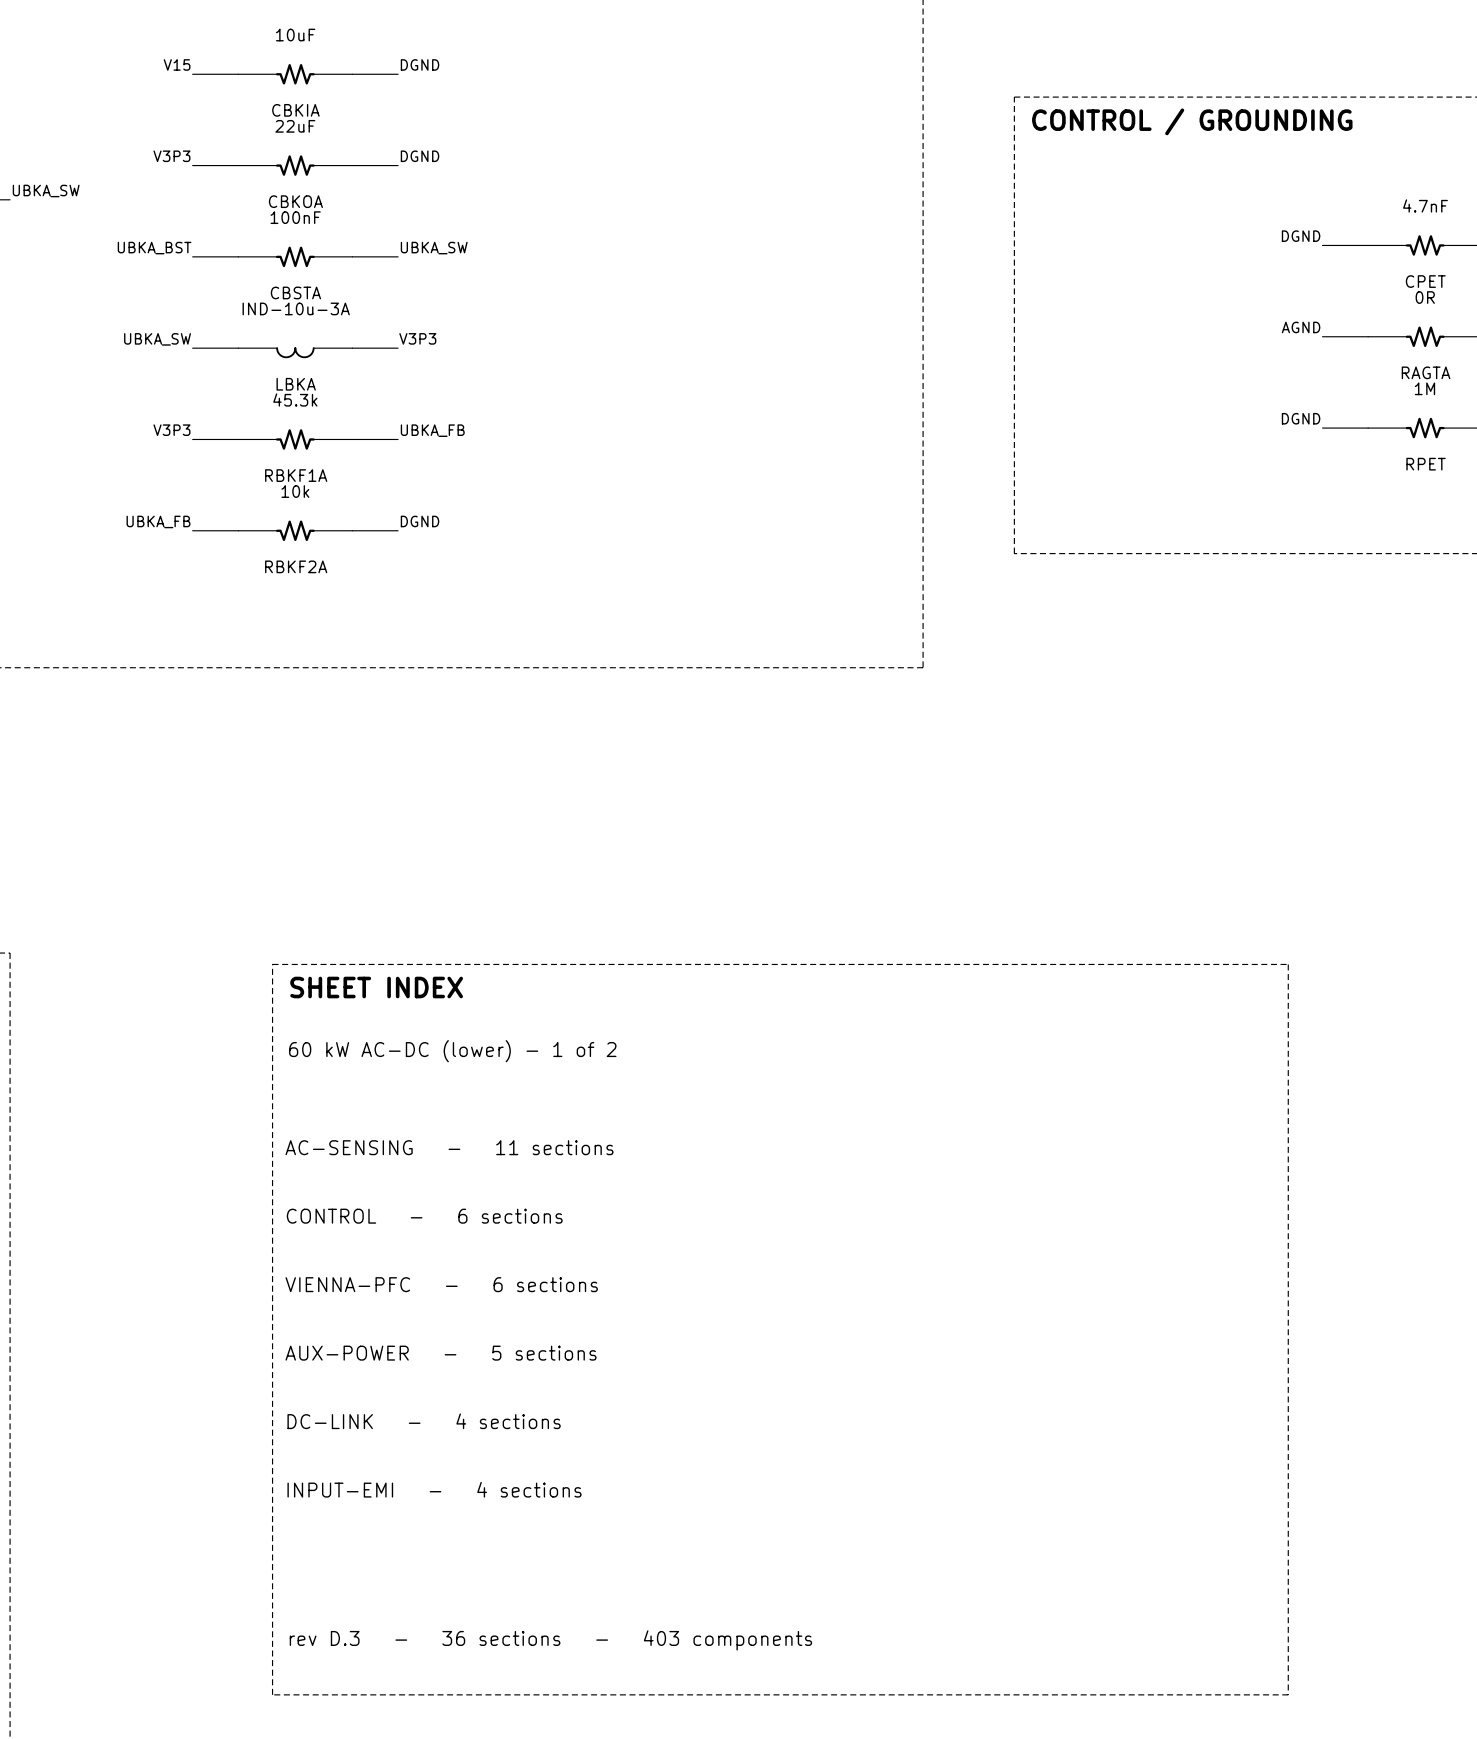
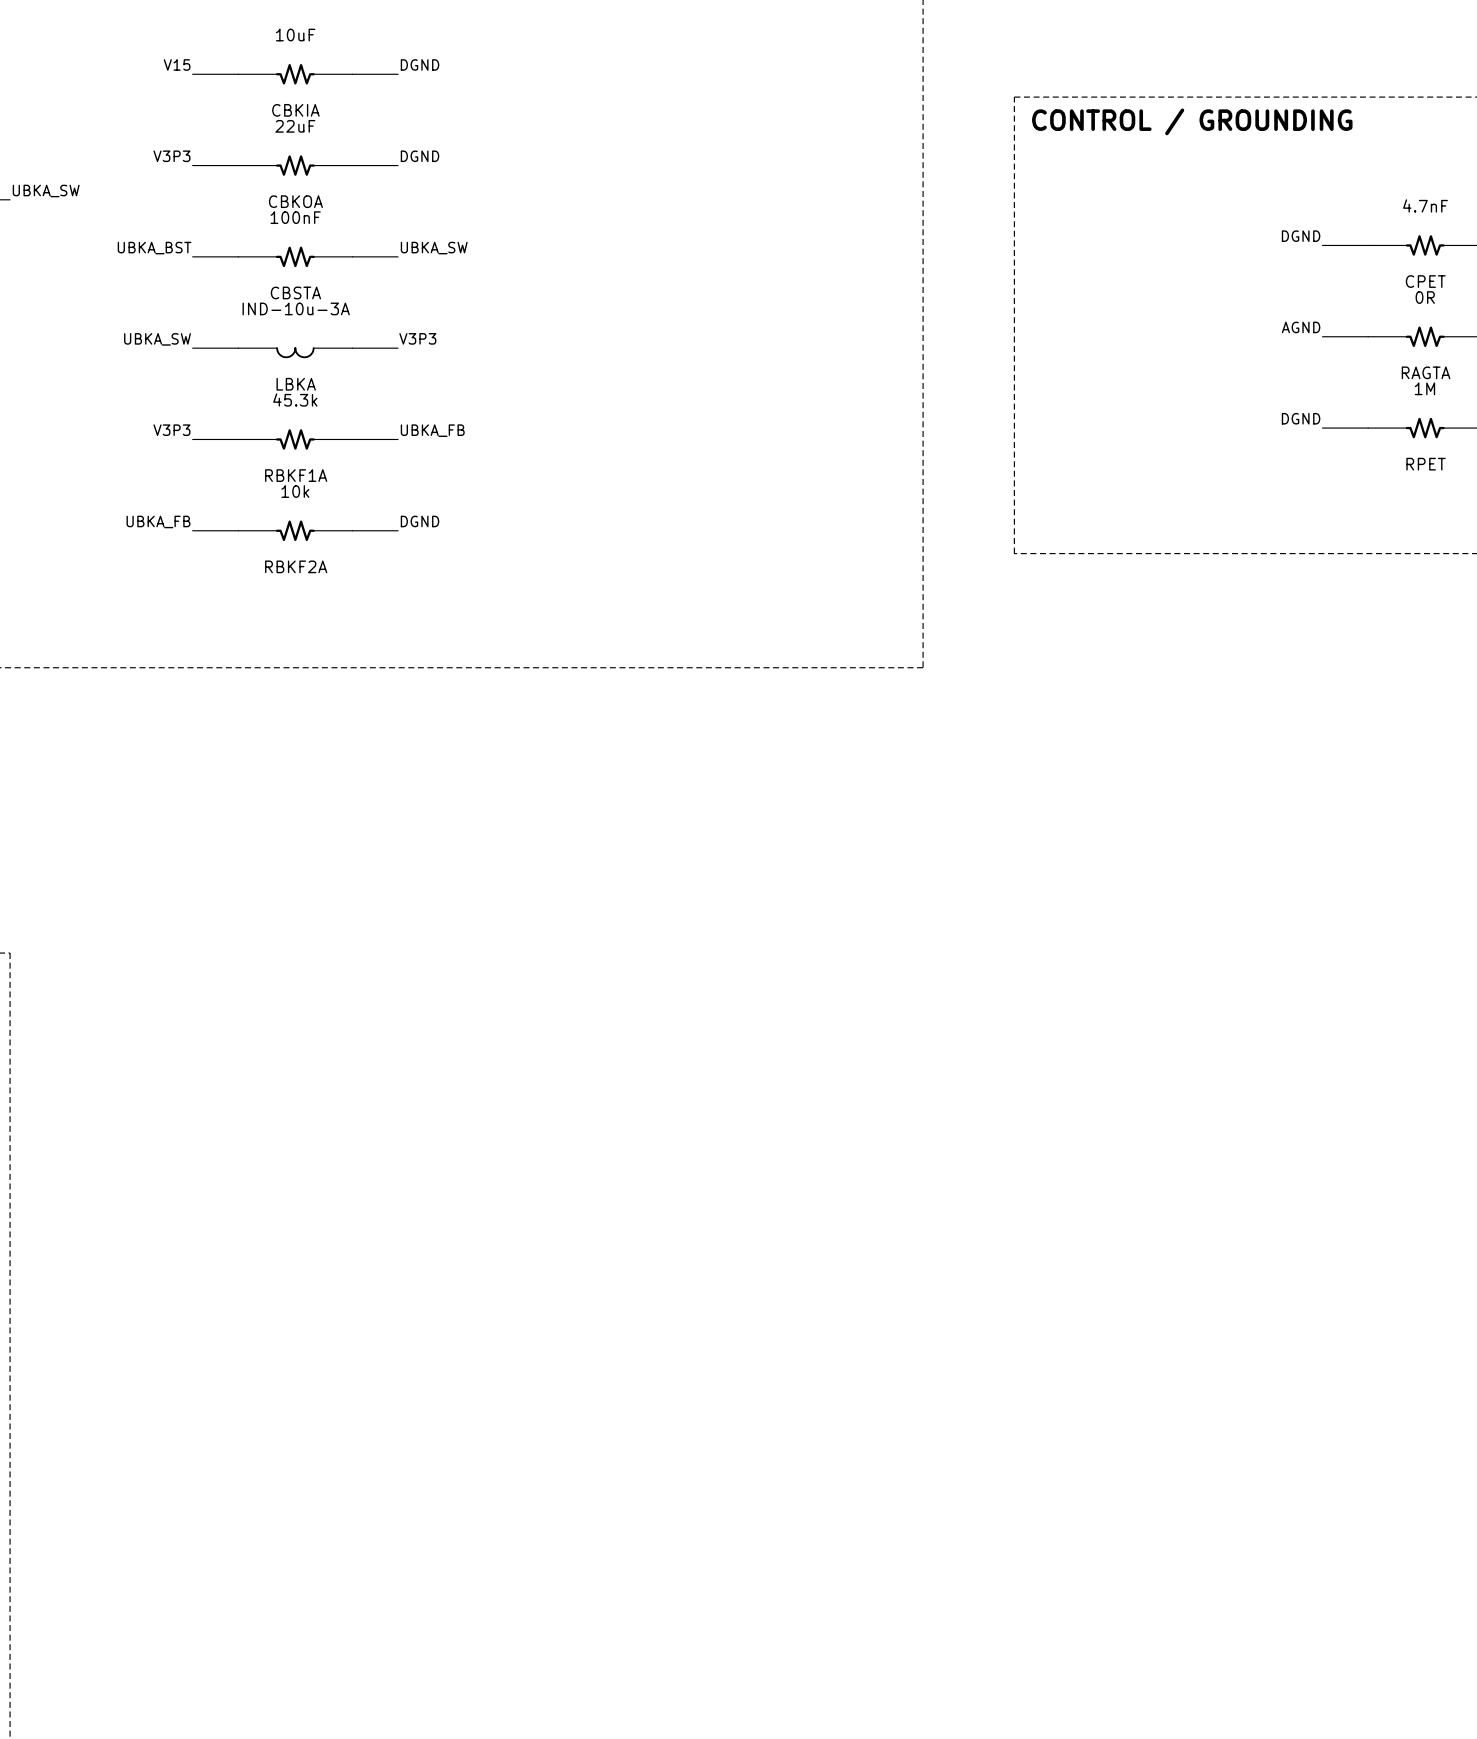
line: (272, 964) (1288, 964) (1288, 1694) (272, 1694) (272, 964) -> none
text: SHEET INDEX (376, 987) -> none
text: 60 kW AC-DC (lower) - 1 of 2 (452, 1051) -> none
text: AC-SENSING - 11 sections (449, 1147) -> none
text: CONTROL - 6 sections (424, 1216) -> none
text: VIENNA-PFC - 6 sections (441, 1284) -> none
text: AUX-POWER - 5 sections (441, 1353) -> none
text: DC-LINK - 4 sections (424, 1421) -> none
text: INPUT-EMI - 4 sections (434, 1489) -> none
text: rev D.3 - 36 sections - 403 components (550, 1640) -> none

